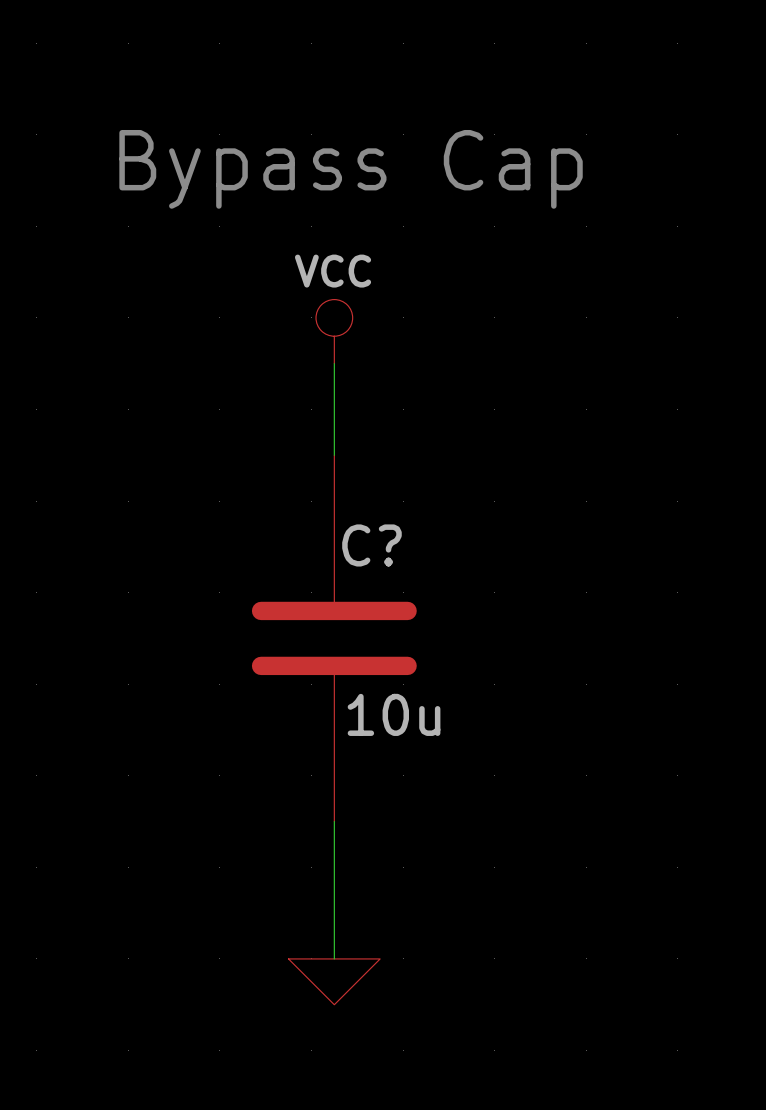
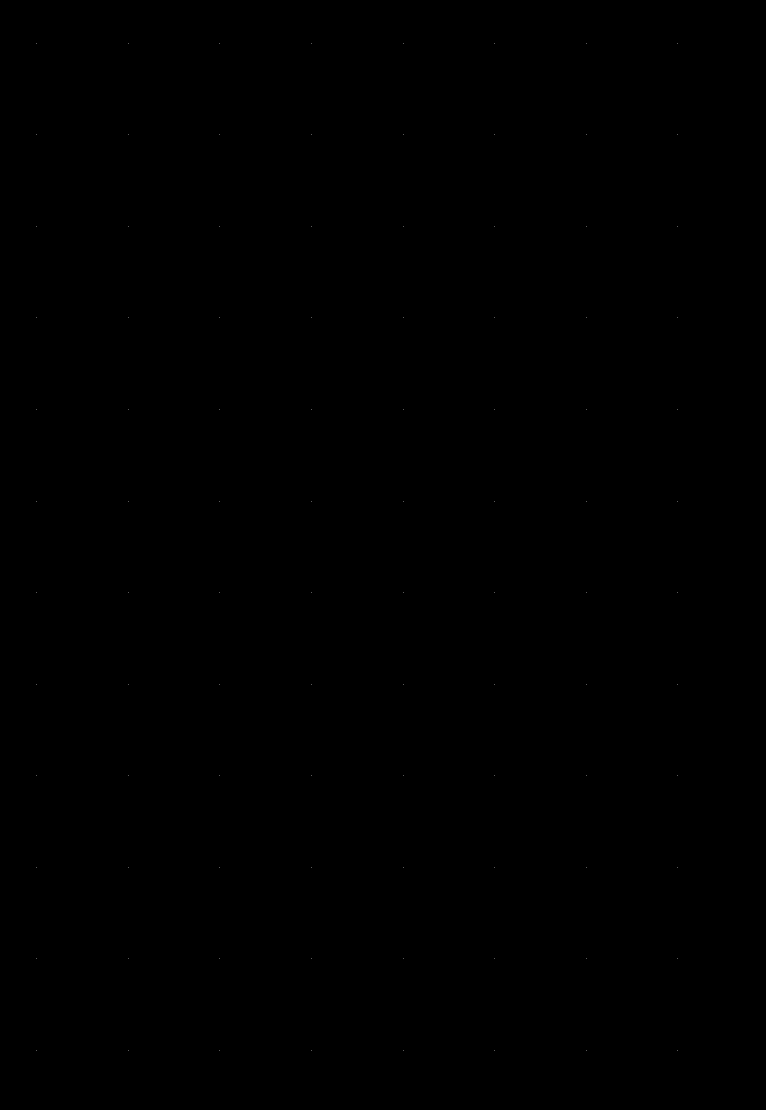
text: Bypass Cap (351, 169) -> none
power symbol: VCC (334, 331) -> none
wire: (334, 363) (334, 455) -> none
C?: 10u (334, 638) -> none
wire: (334, 821) (334, 958) -> none
power symbol: (334, 981) -> none

